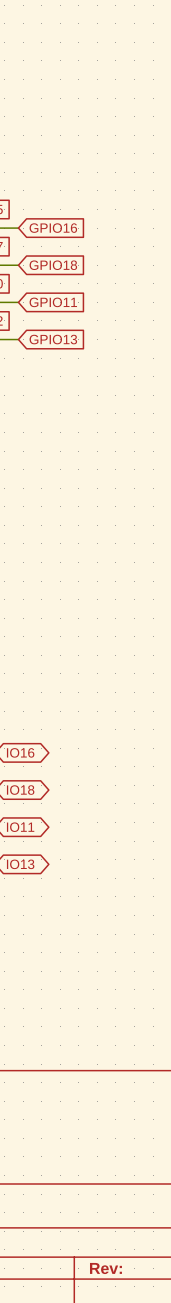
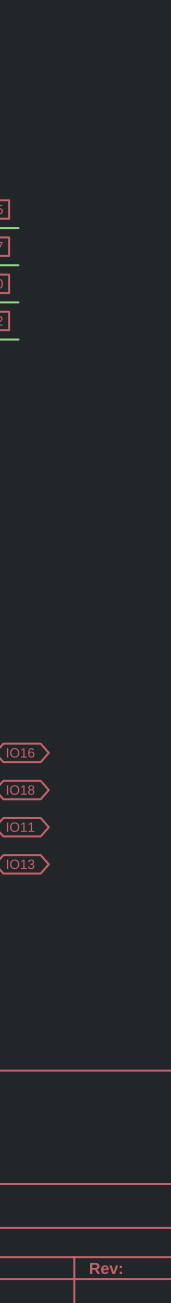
global label: GPIO16 (53, 228) -> none
global label: GPIO18 (53, 265) -> none
global label: GPIO11 (53, 302) -> none
global label: GPIO13 (53, 339) -> none

